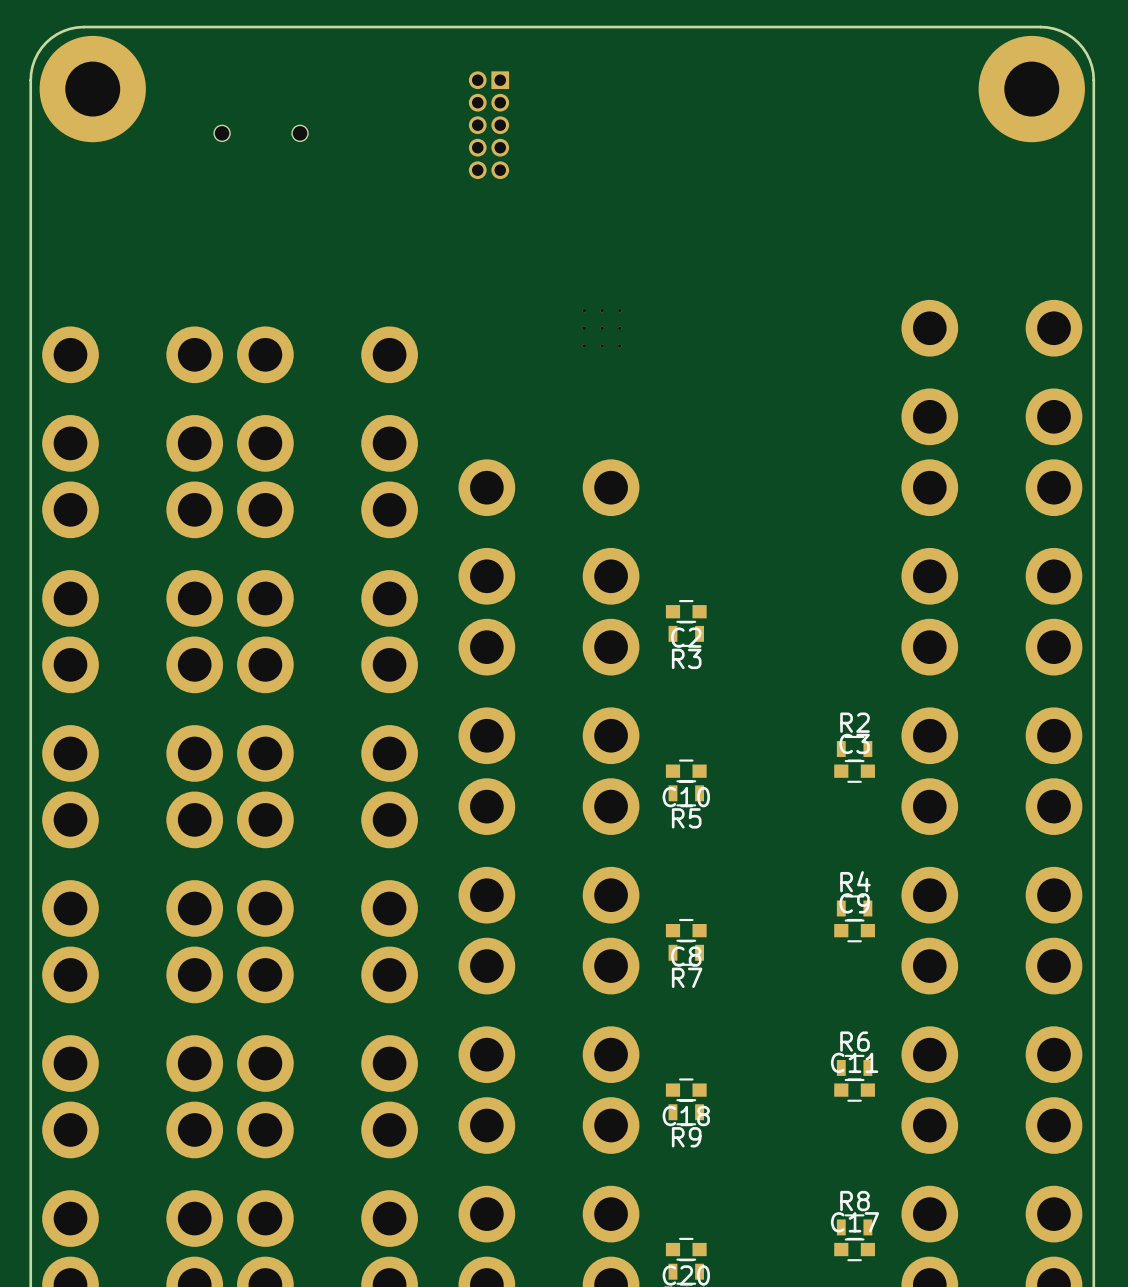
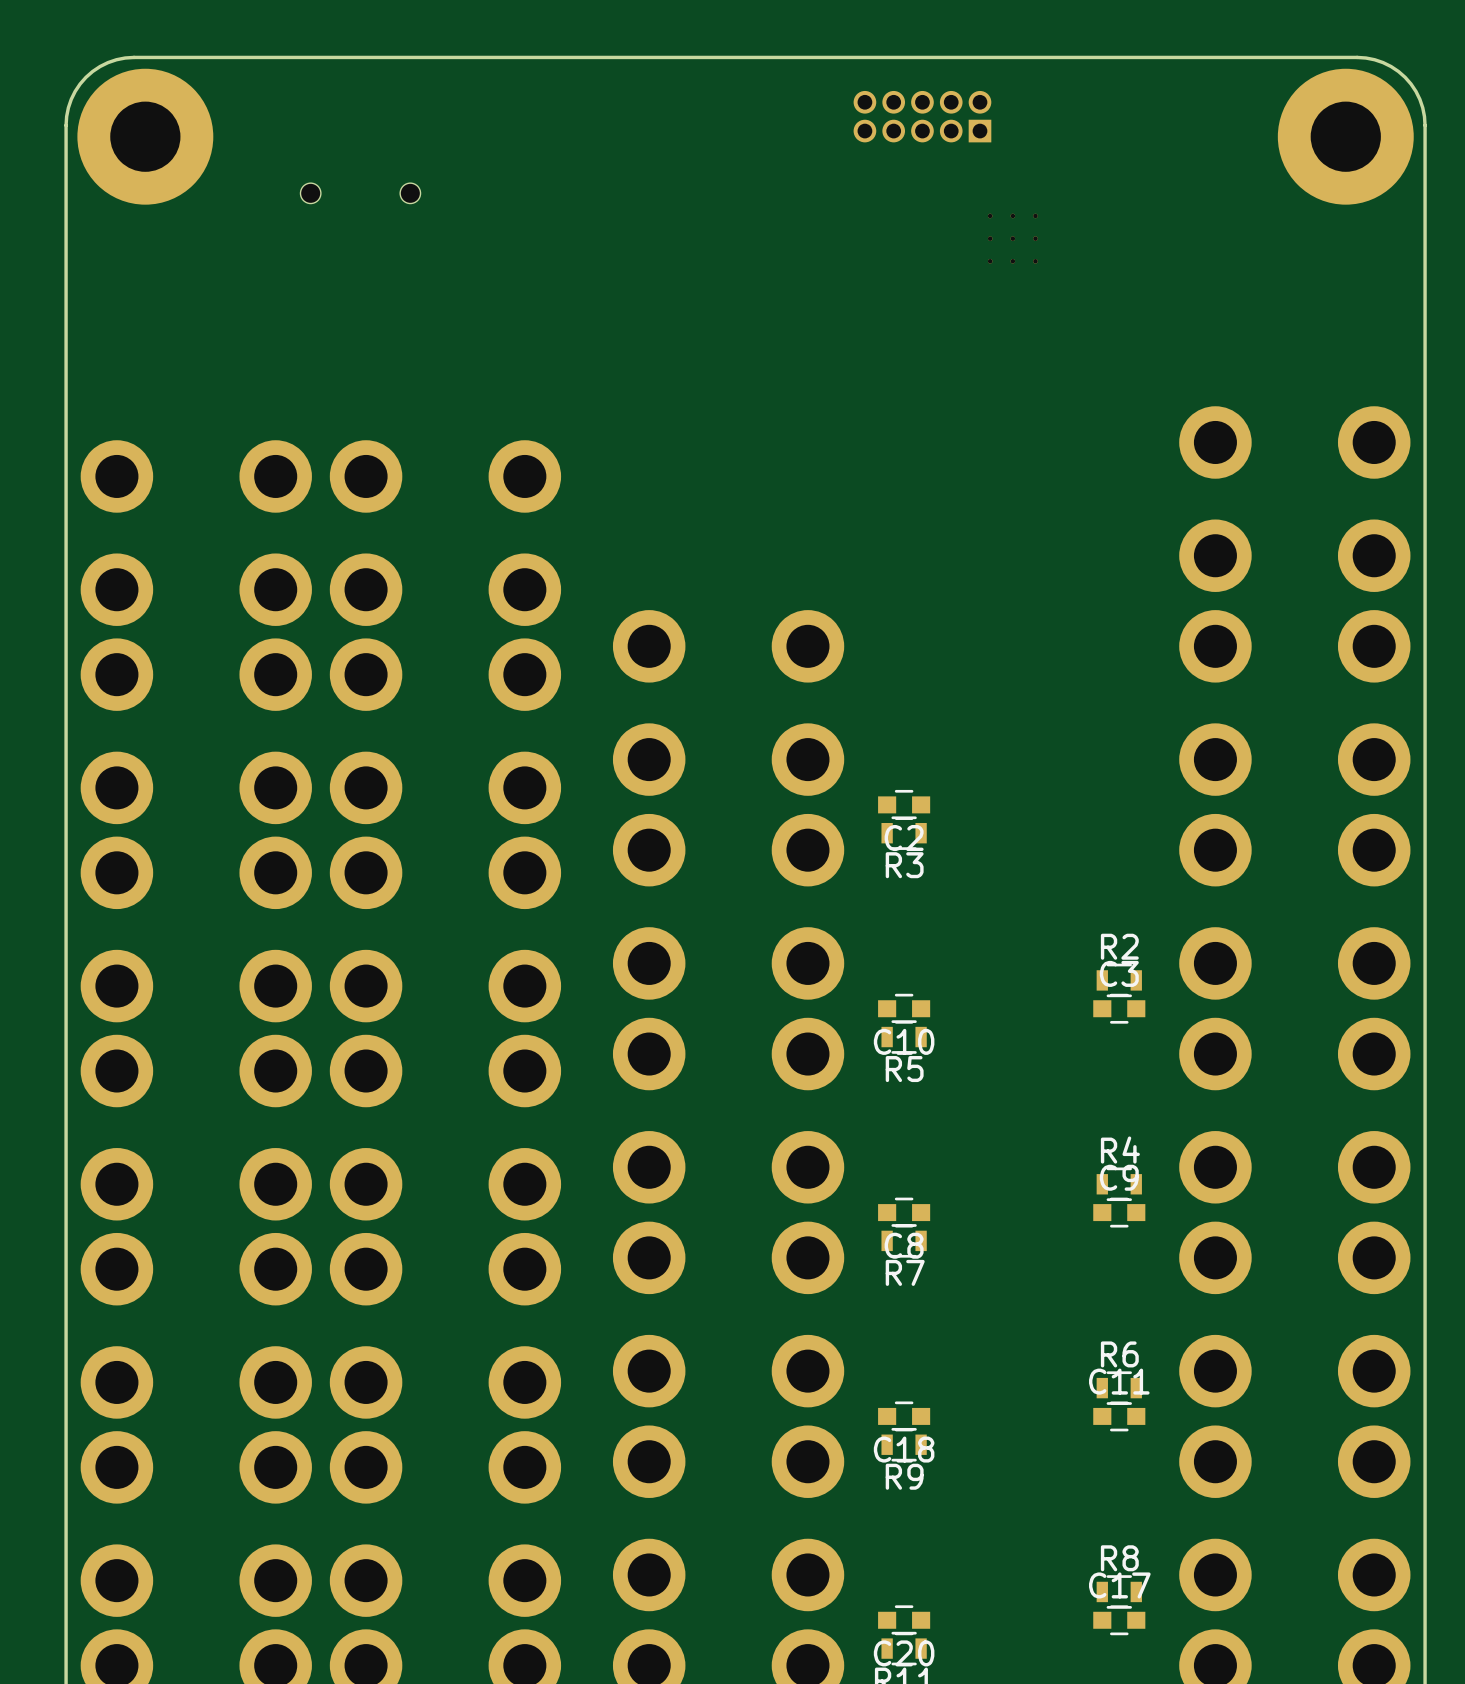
part rotation: 0° (488, 125) -> 90° clockwise (922, 116)
part position: (488, 125) -> (922, 116)
part position: (602, 328) -> (1012, 238)

